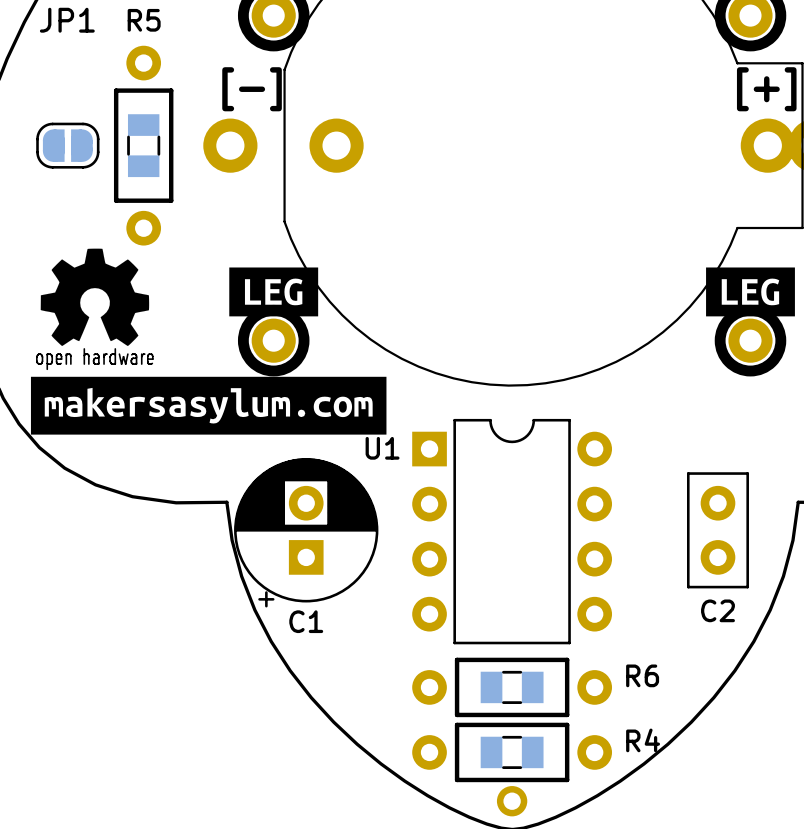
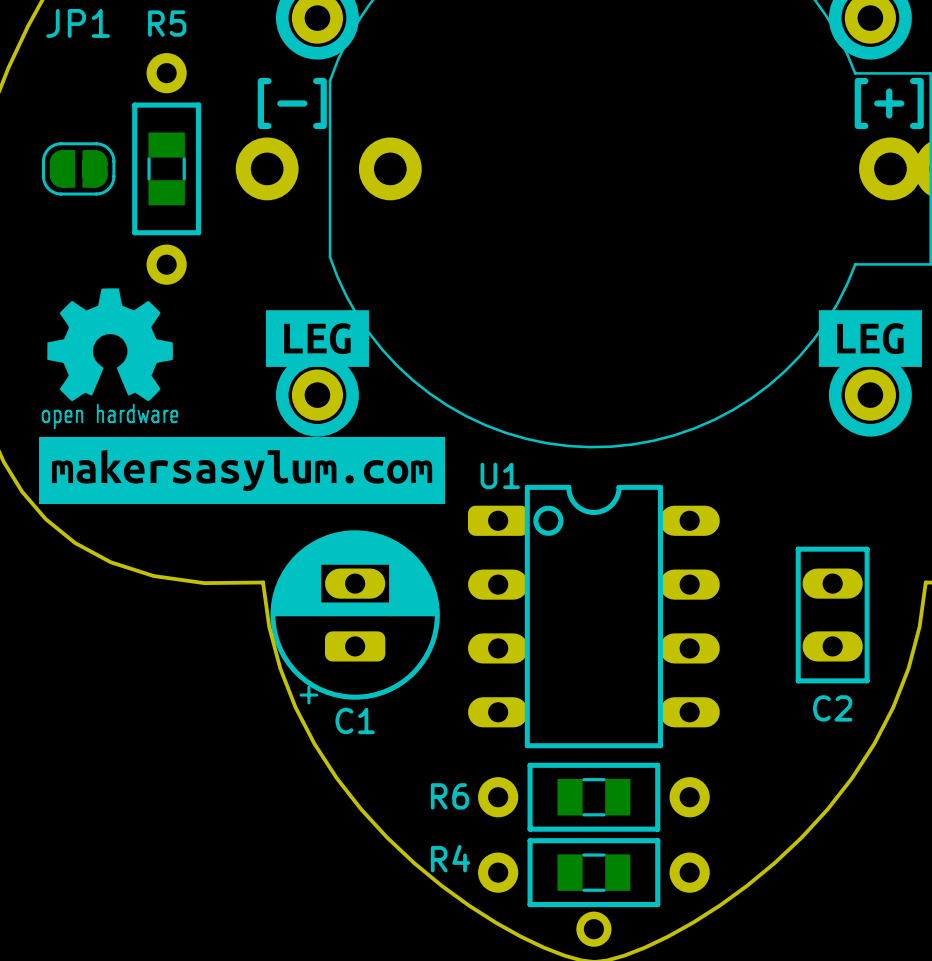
drawing shape: [30, 376, 387, 435] -> [39, 436, 446, 505]
U1 footprint: [412, 418, 613, 645] -> [467, 484, 720, 749]
U1 name position: U1 (382, 448) -> U1 (500, 475)
C1 footprint: [234, 458, 379, 608] -> [270, 530, 440, 705]
C2 footprint: [686, 472, 749, 589] -> [795, 546, 870, 684]
R6 name position: R6 (642, 675) -> R6 (449, 796)
R4 name position: R4 (643, 740) -> R4 (450, 858)

